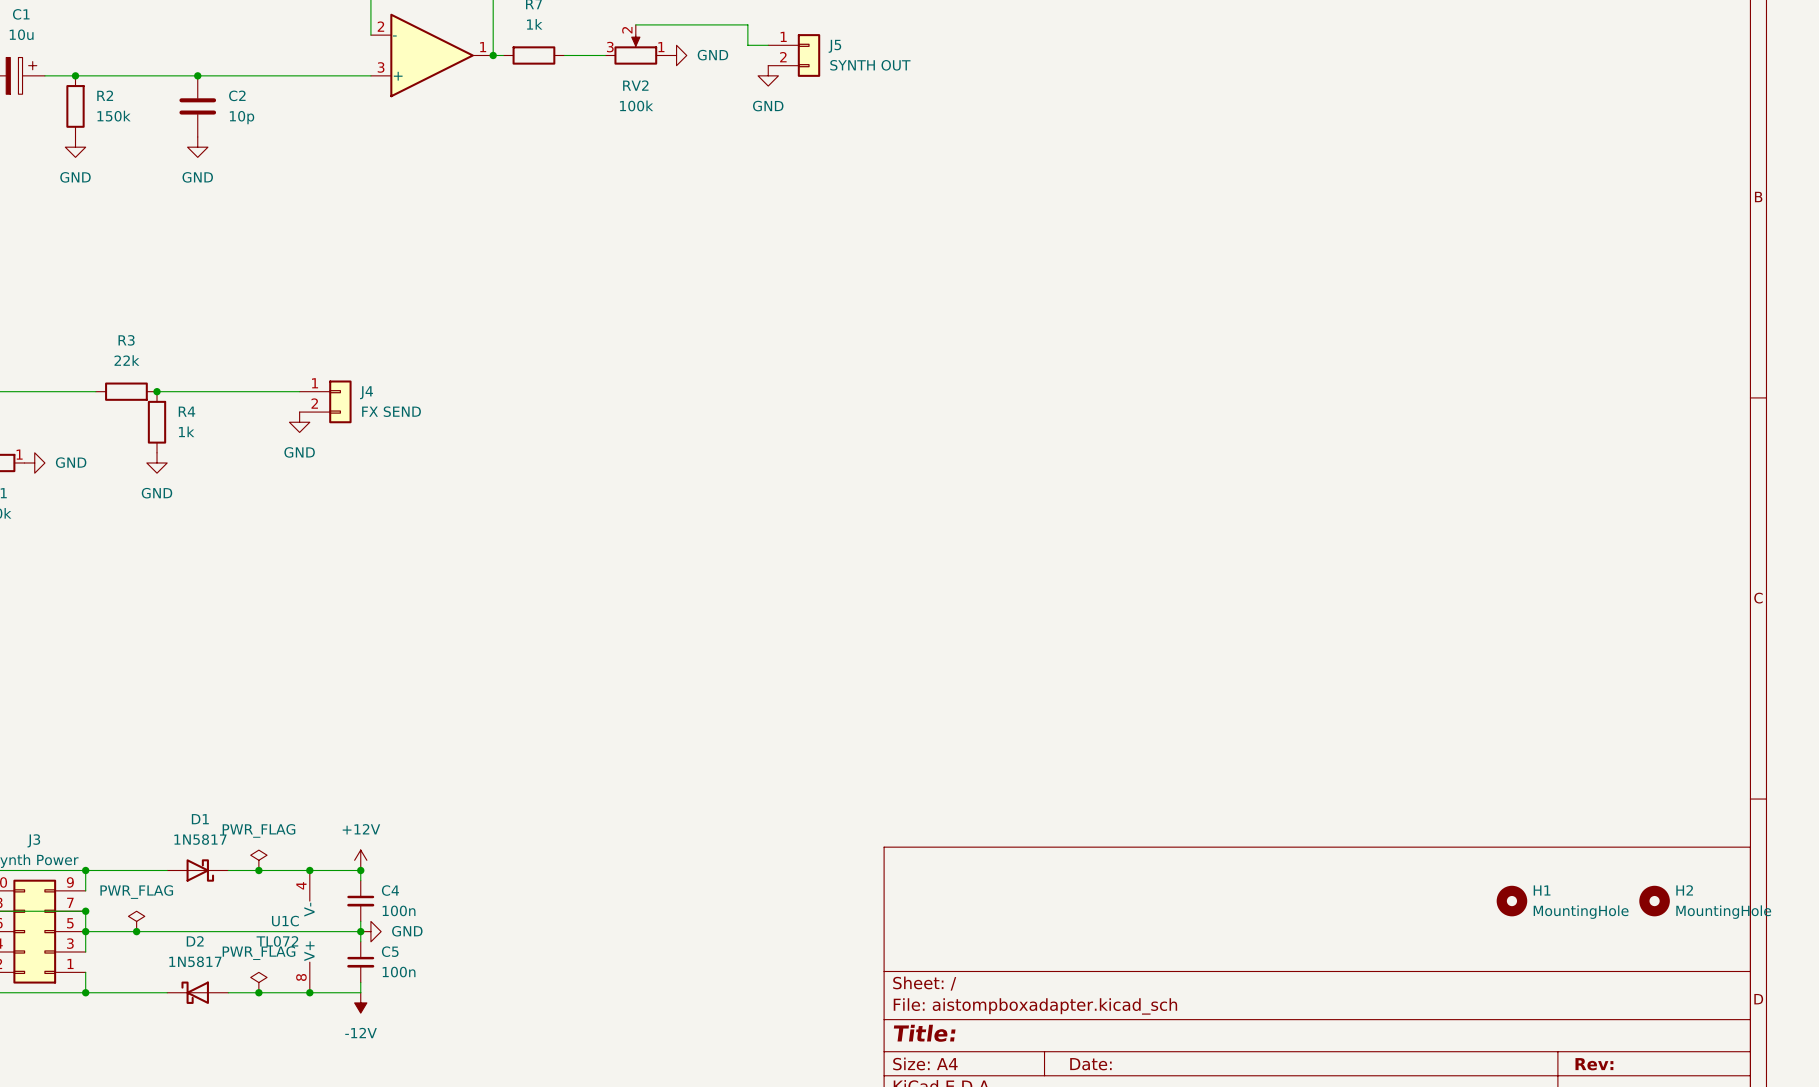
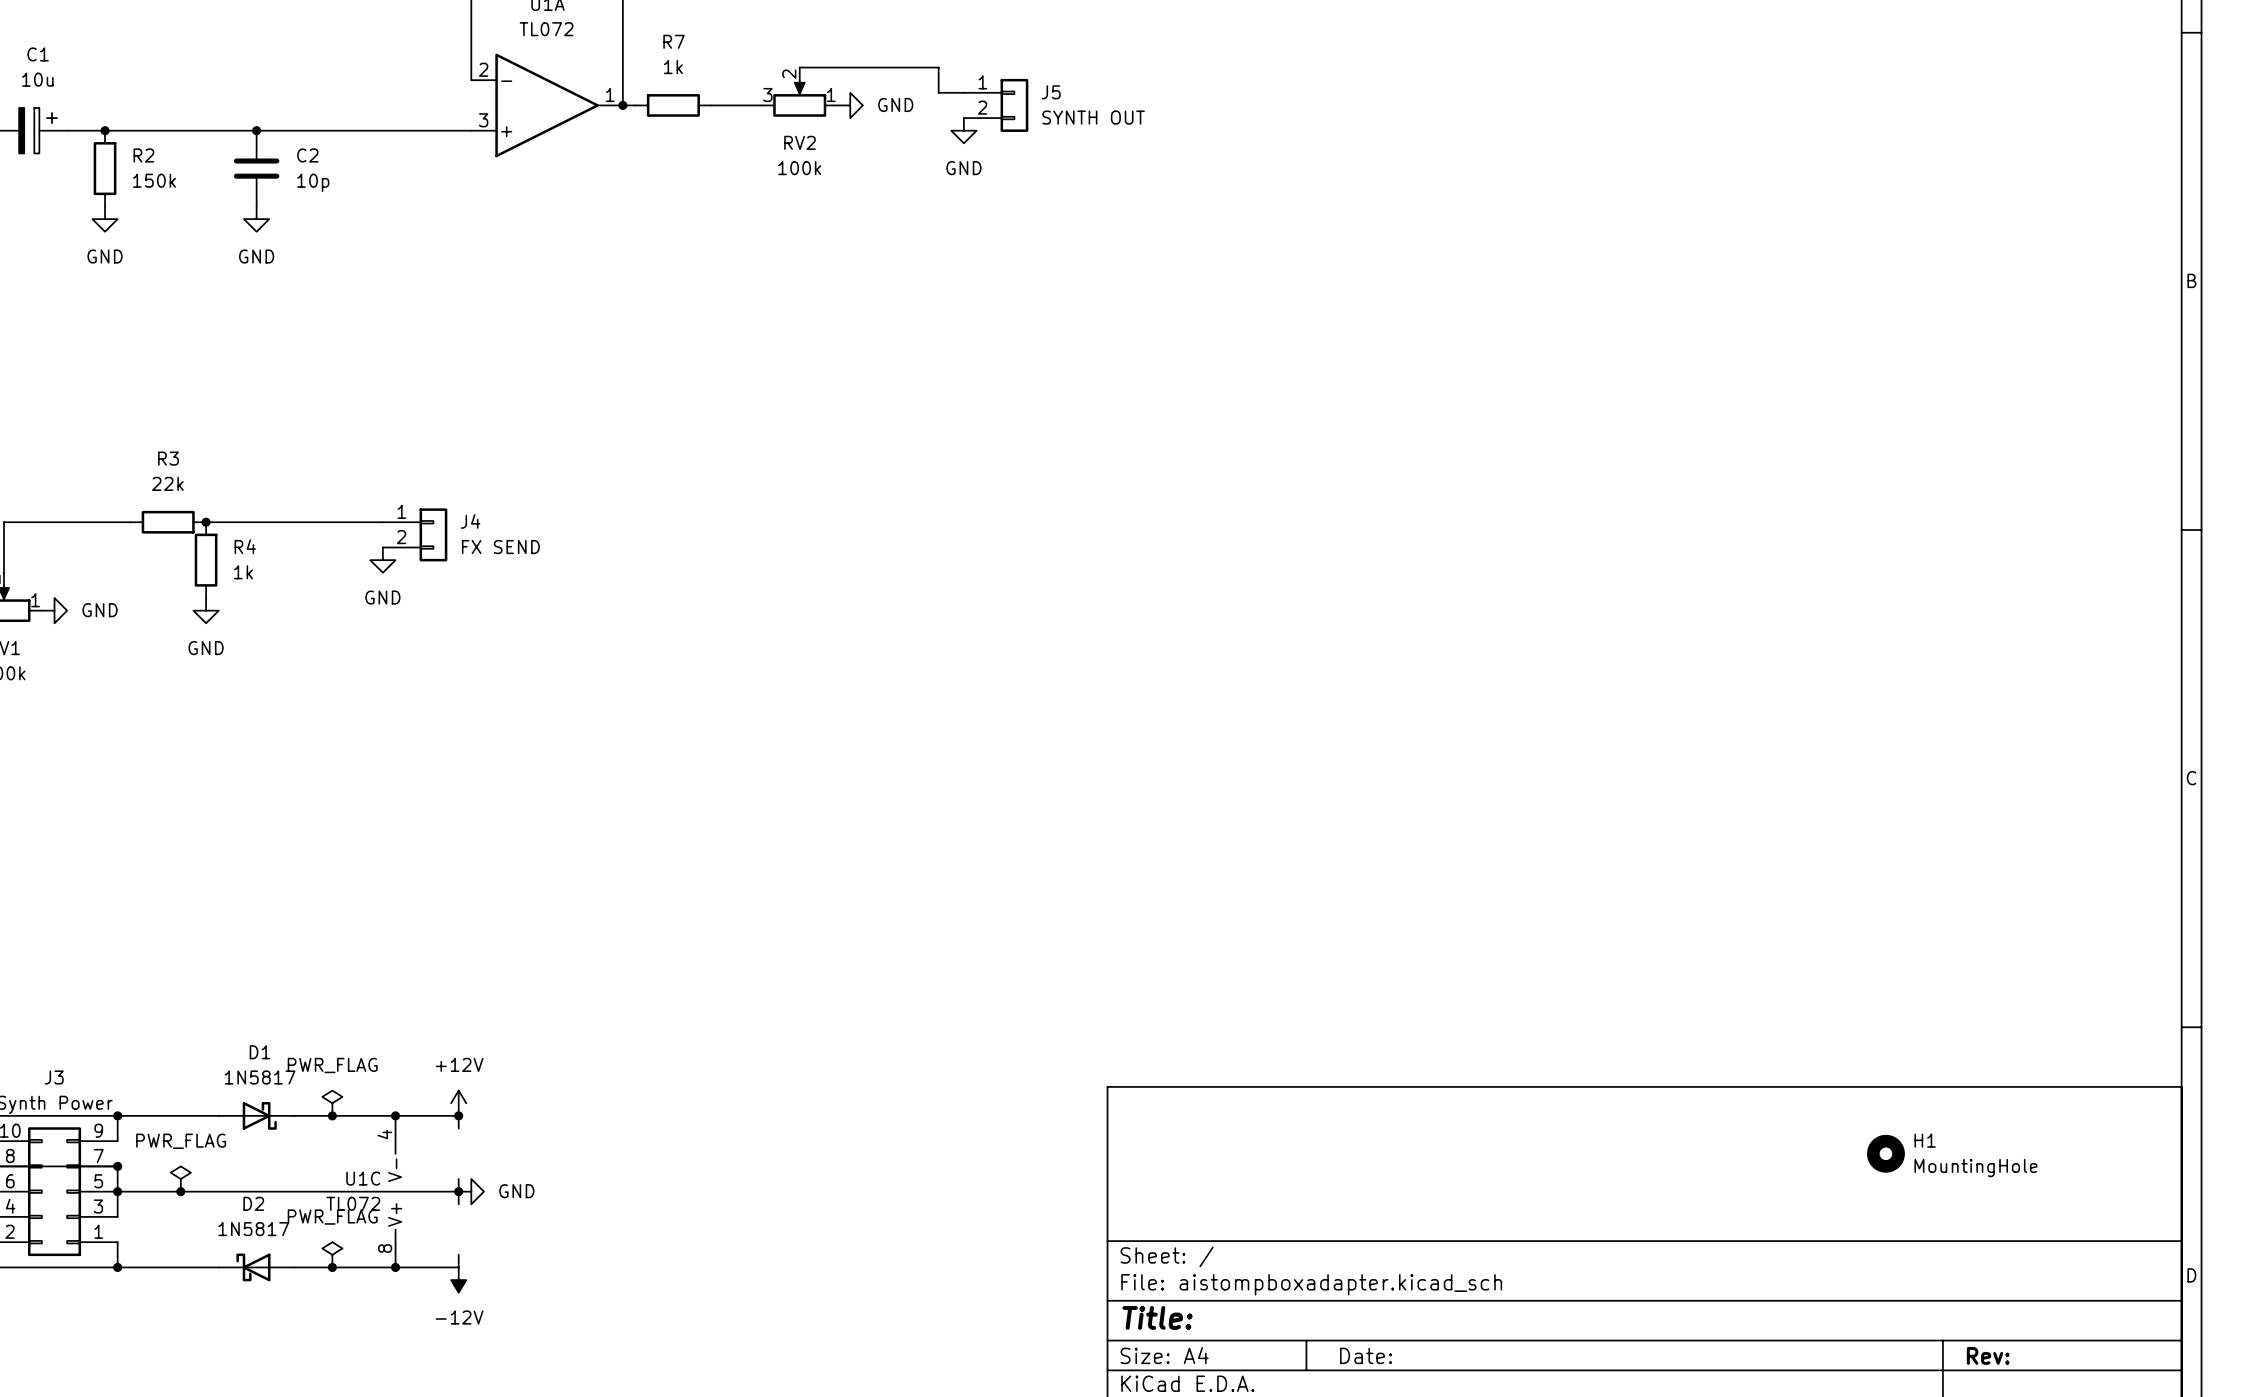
C4: 100n (360, 901) -> none
H2: MountingHole (1654, 901) -> none
C5: 100n (360, 962) -> none

